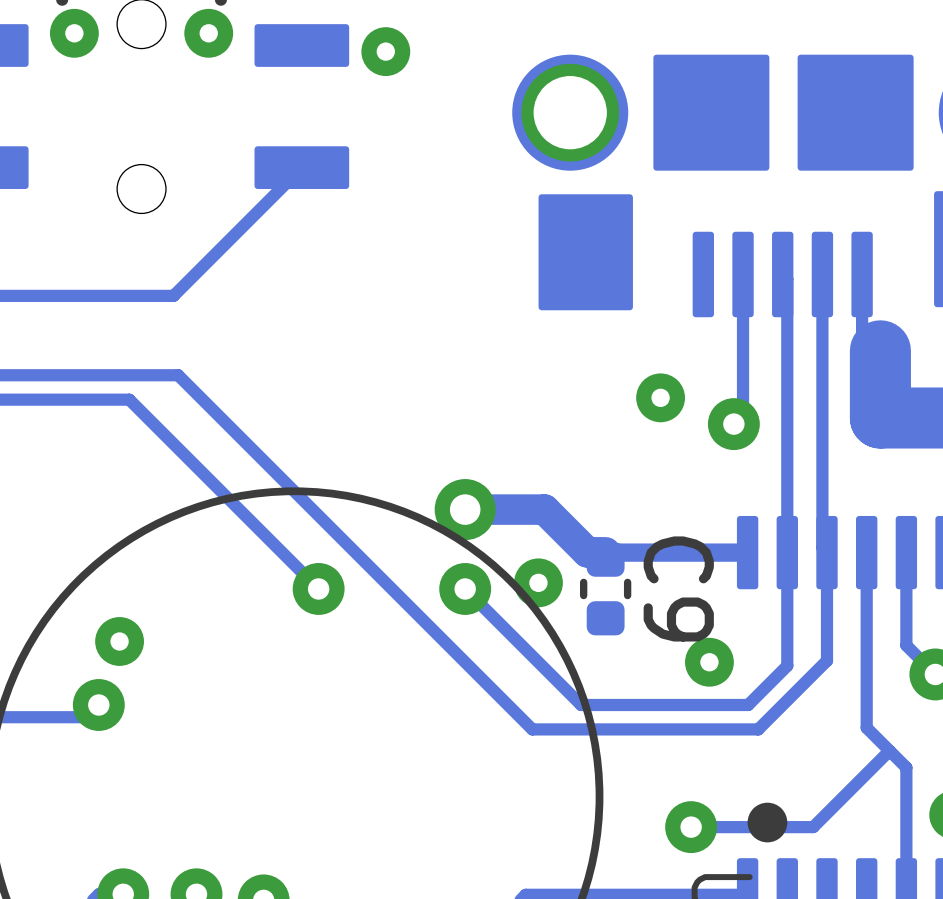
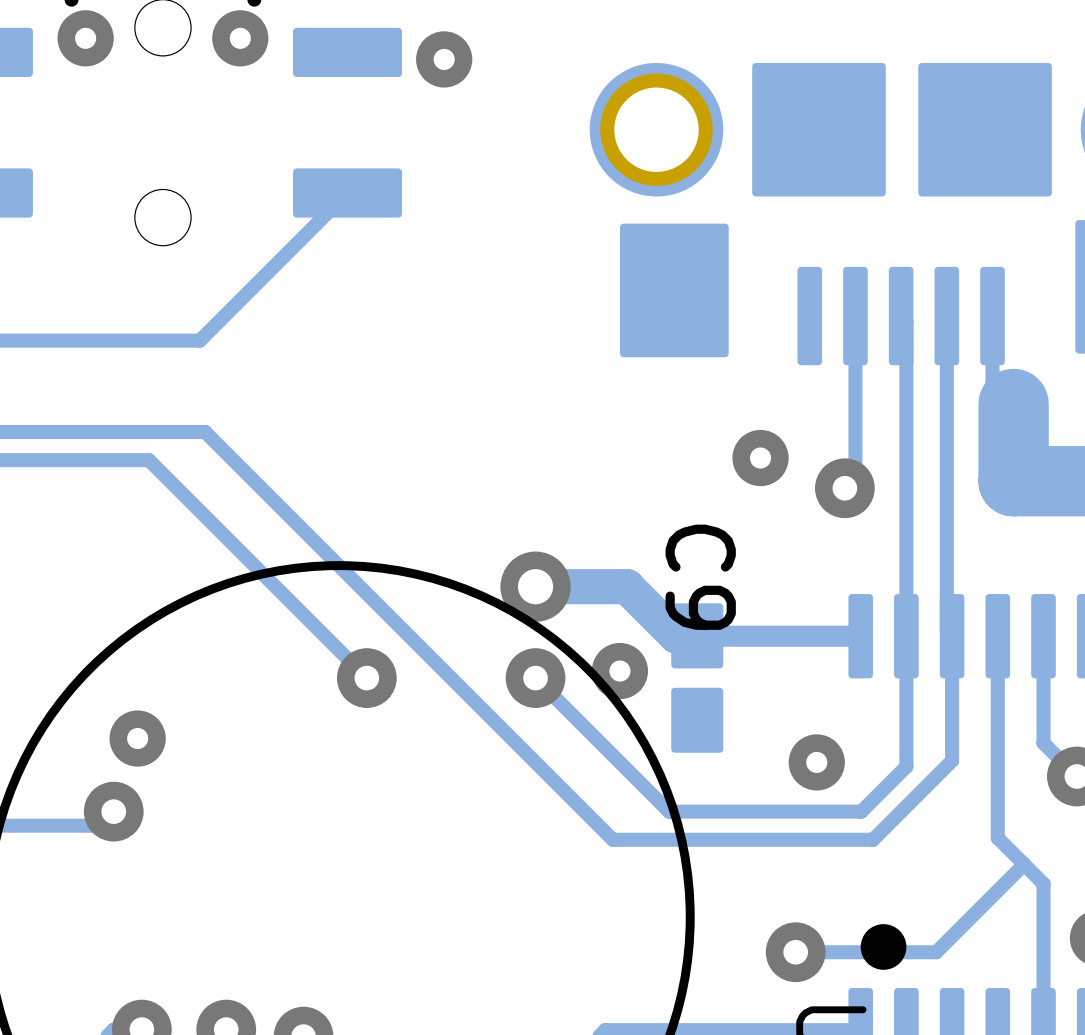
C9 footprint: [579, 542, 632, 636] -> [671, 603, 724, 753]

